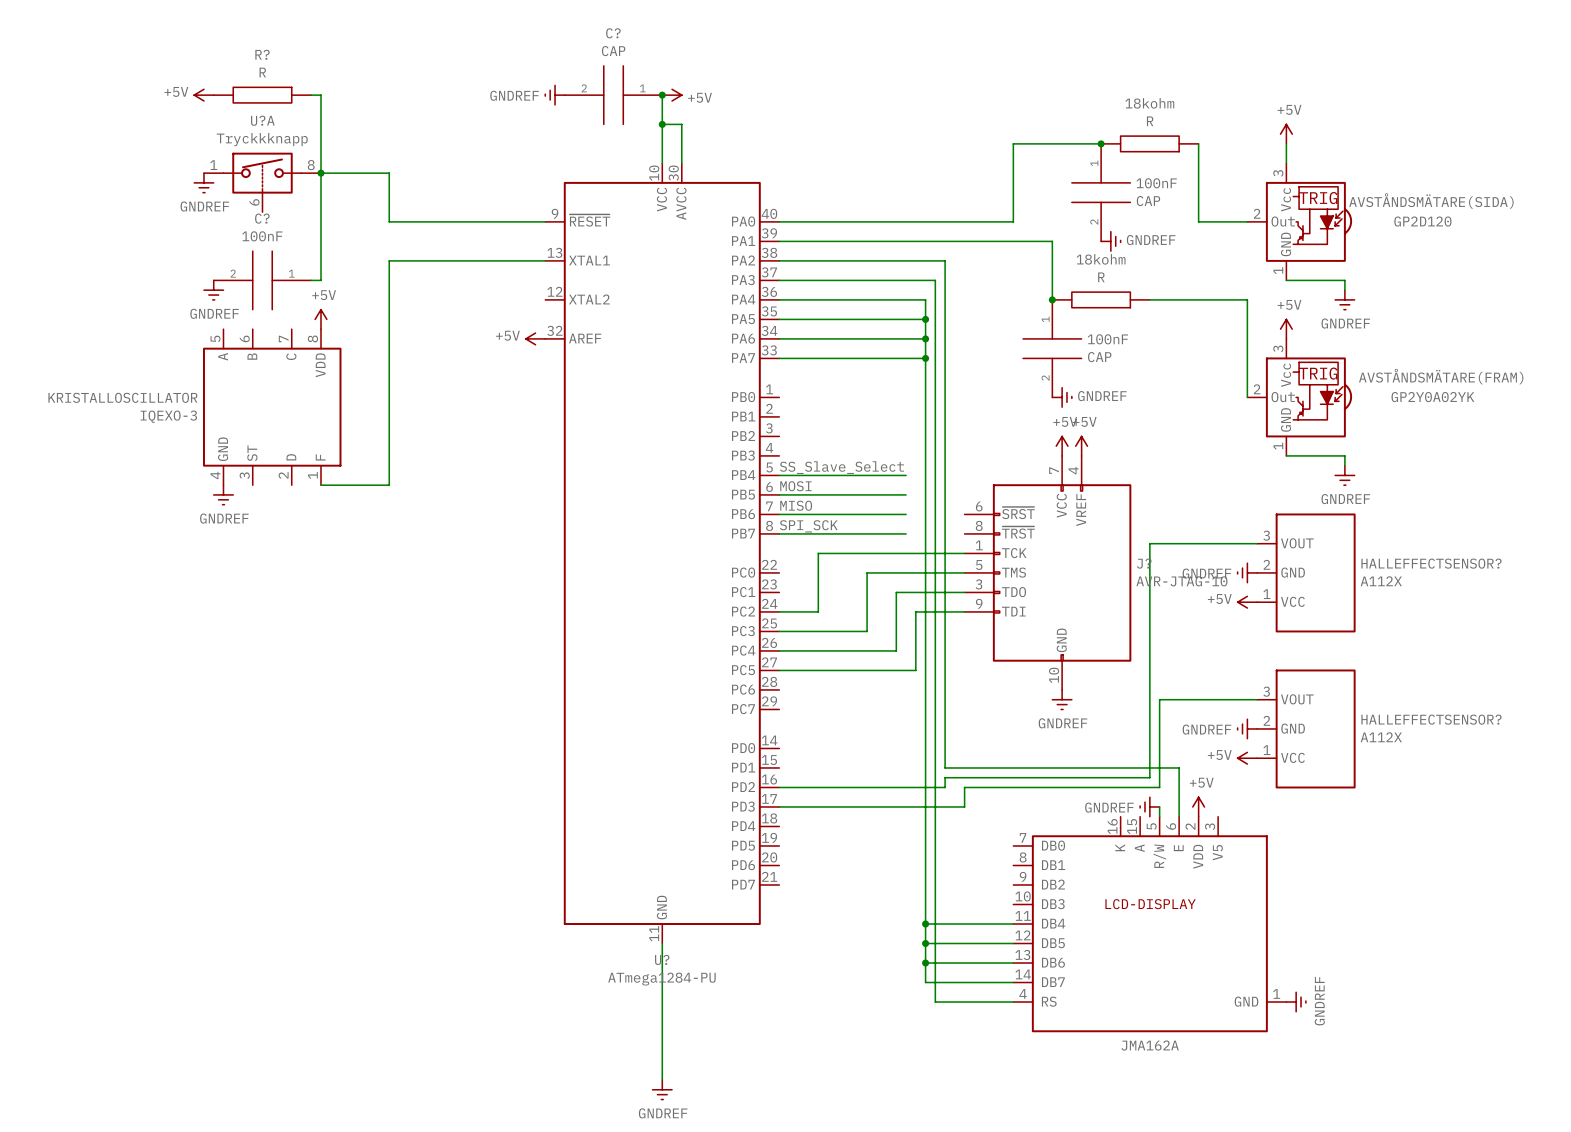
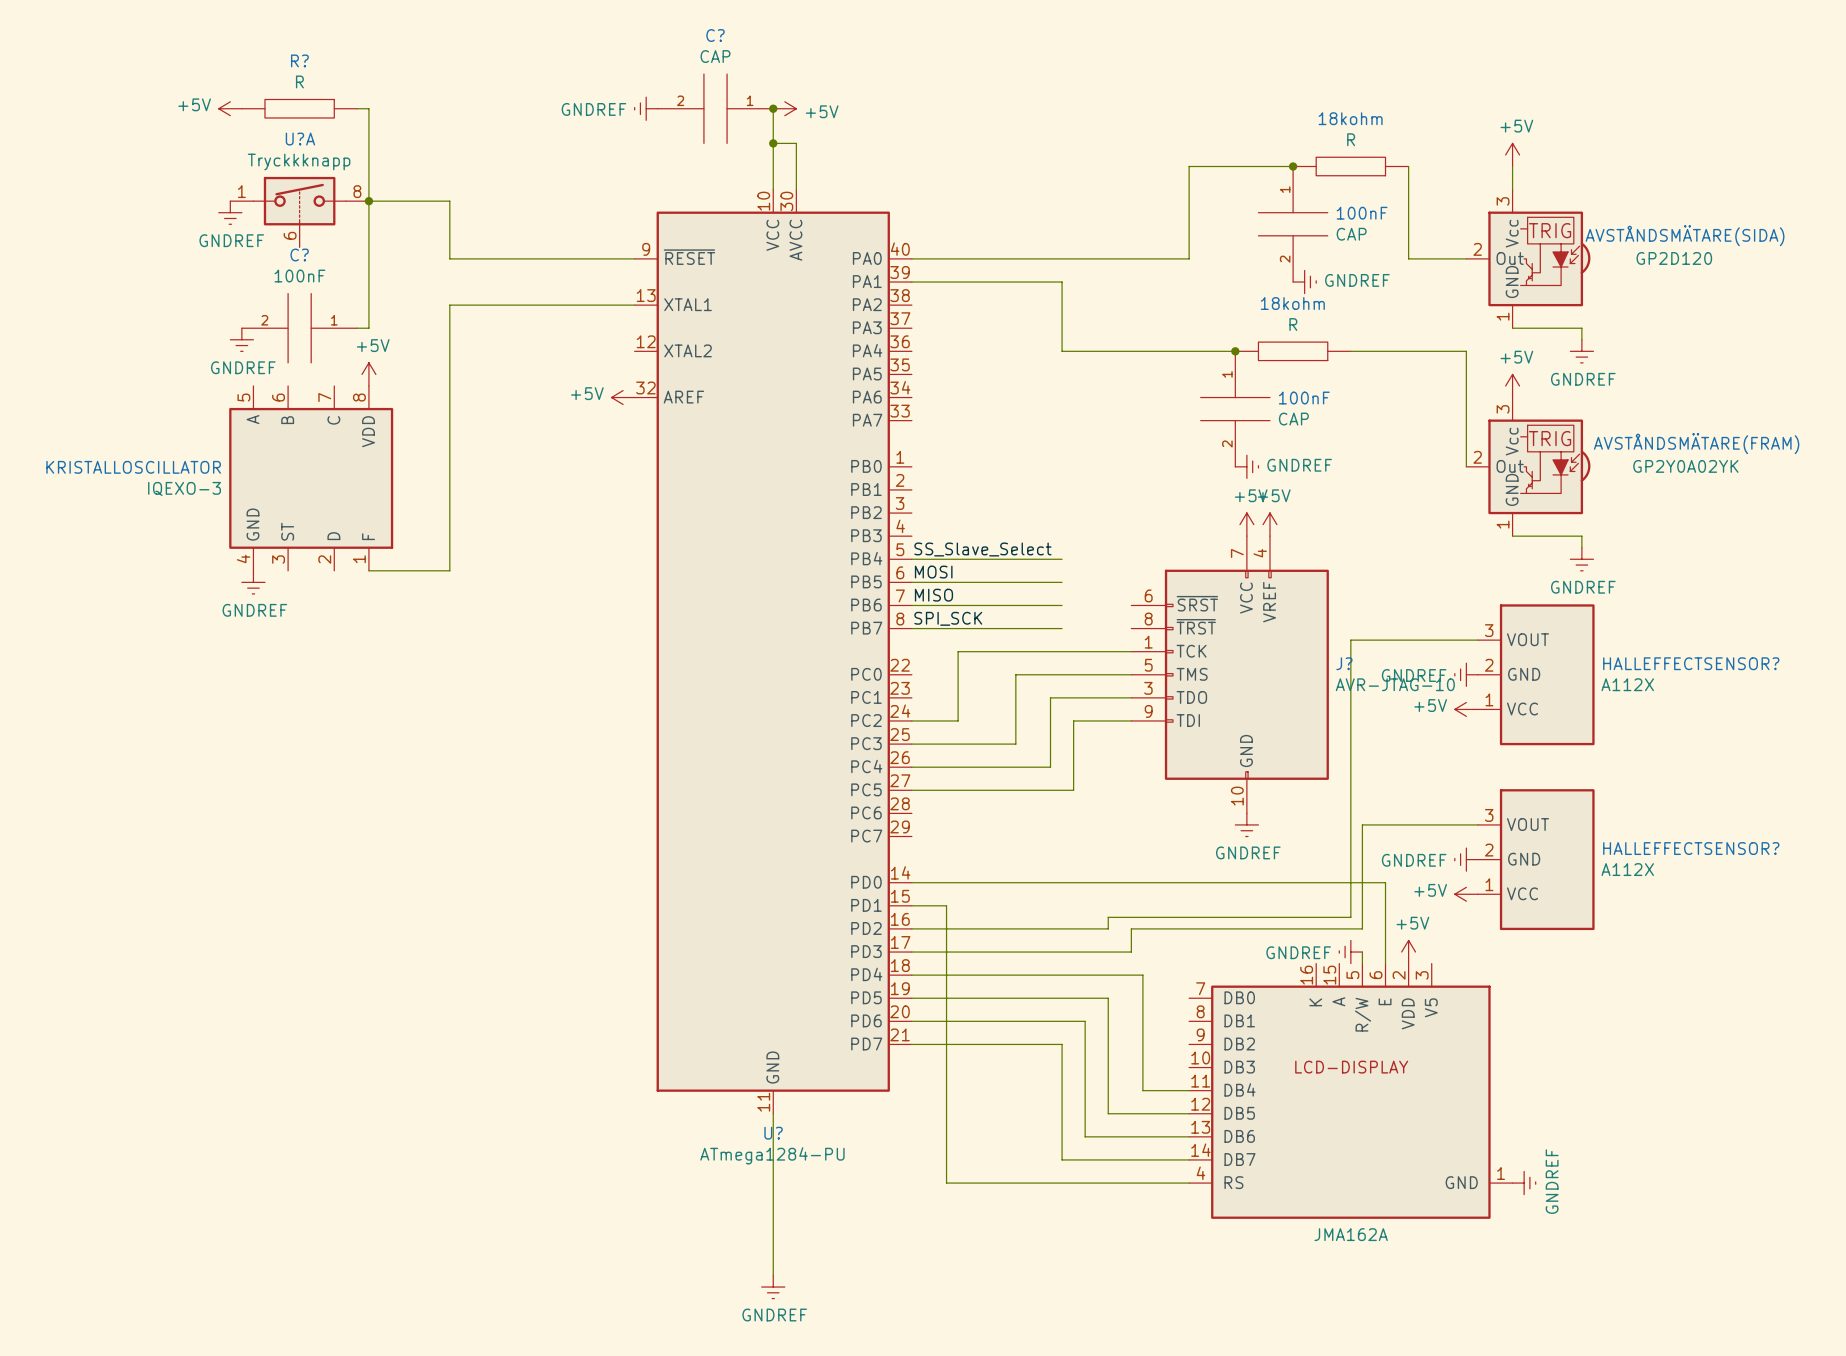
wire: (906, 241) (1052, 241) (1052, 299) -> (1085, 351) (1235, 351)
wire: (779, 260) (945, 260) (945, 767) (1179, 767) -> (911, 882) (1385, 882) (1385, 905)
wire: (779, 280) (935, 280) (935, 1002) -> (911, 905) (946, 905) (946, 1183) (1096, 1183)
wire: (779, 299) (906, 299) -> (1062, 282) (1062, 351)
wire: (925, 299) (925, 865) -> (911, 1021) (1085, 1021)
wire: (779, 319) (925, 319) -> none
junction: (925, 319) -> none
wire: (779, 338) (925, 338) -> none
junction: (925, 338) -> none
wire: (779, 358) (925, 358) -> none
junction: (925, 358) -> none
wire: (925, 924) (974, 924) -> (911, 975) (1142, 975) (1142, 1090)
junction: (925, 924) -> none
wire: (925, 943) (945, 943) -> (911, 998) (1108, 998) (1108, 1113)
junction: (925, 943) -> none
wire: (925, 963) (925, 982) -> (911, 1044) (1062, 1044) (1062, 1159) (1085, 1159)
junction: (925, 963) -> none

